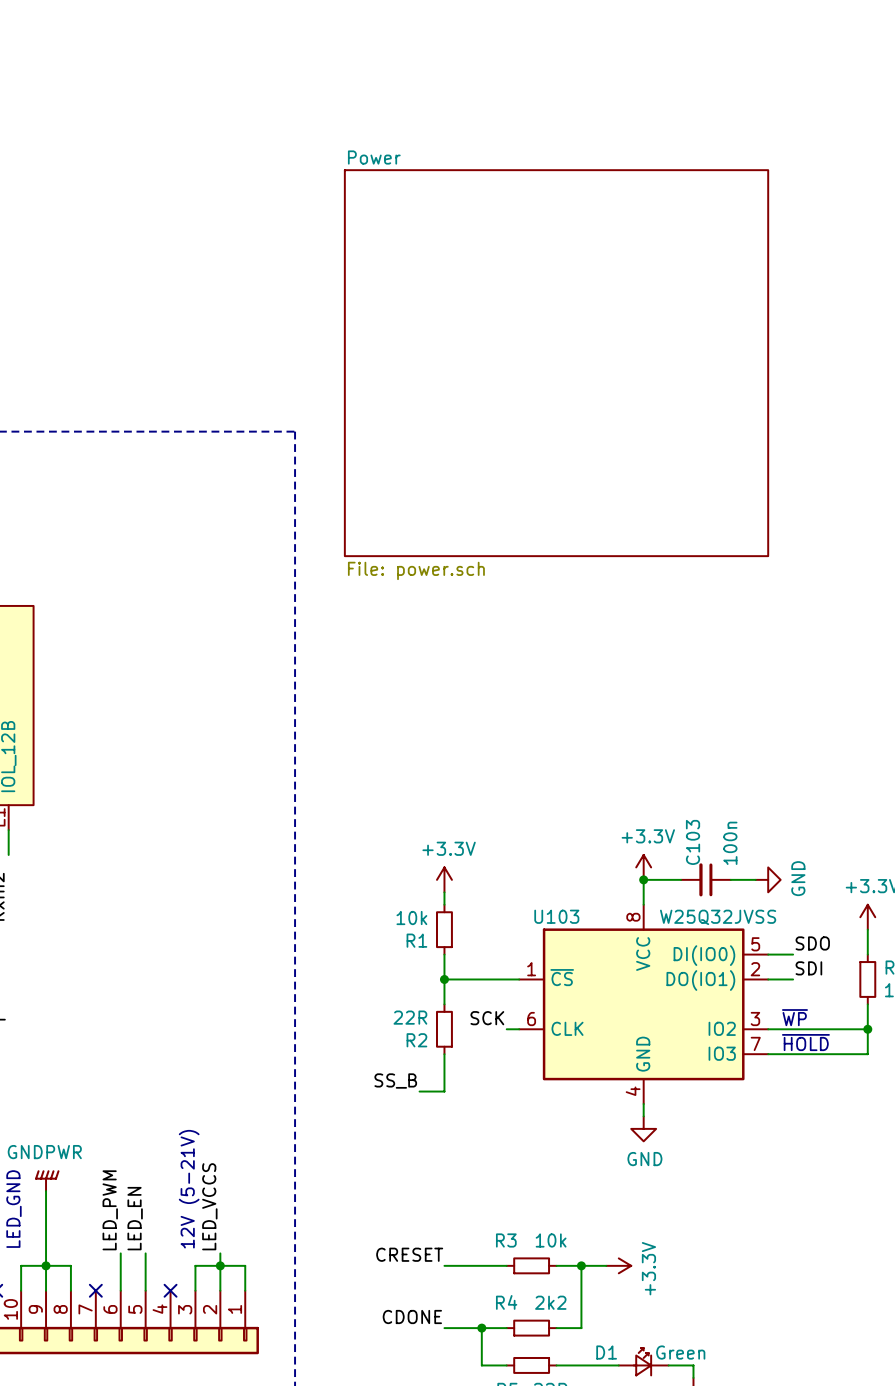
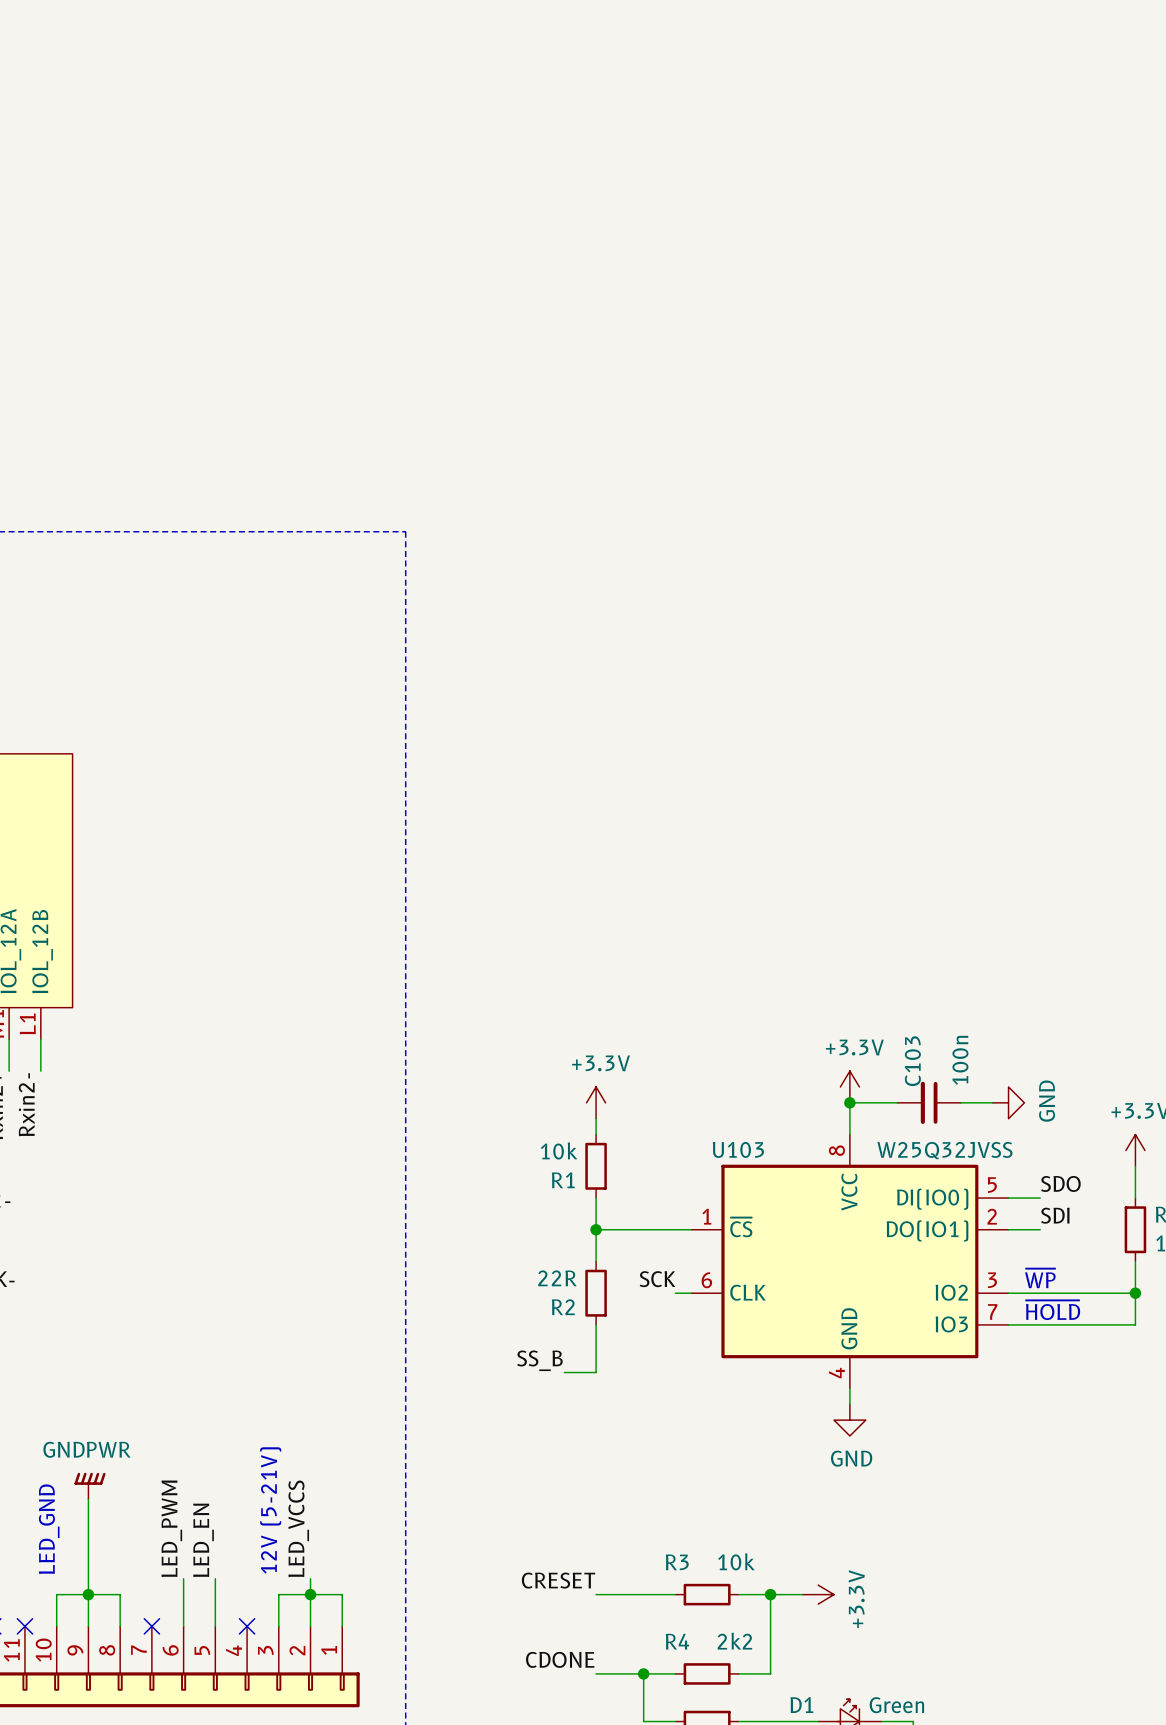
sheet Power: File: power.sch (556, 363) -> none

